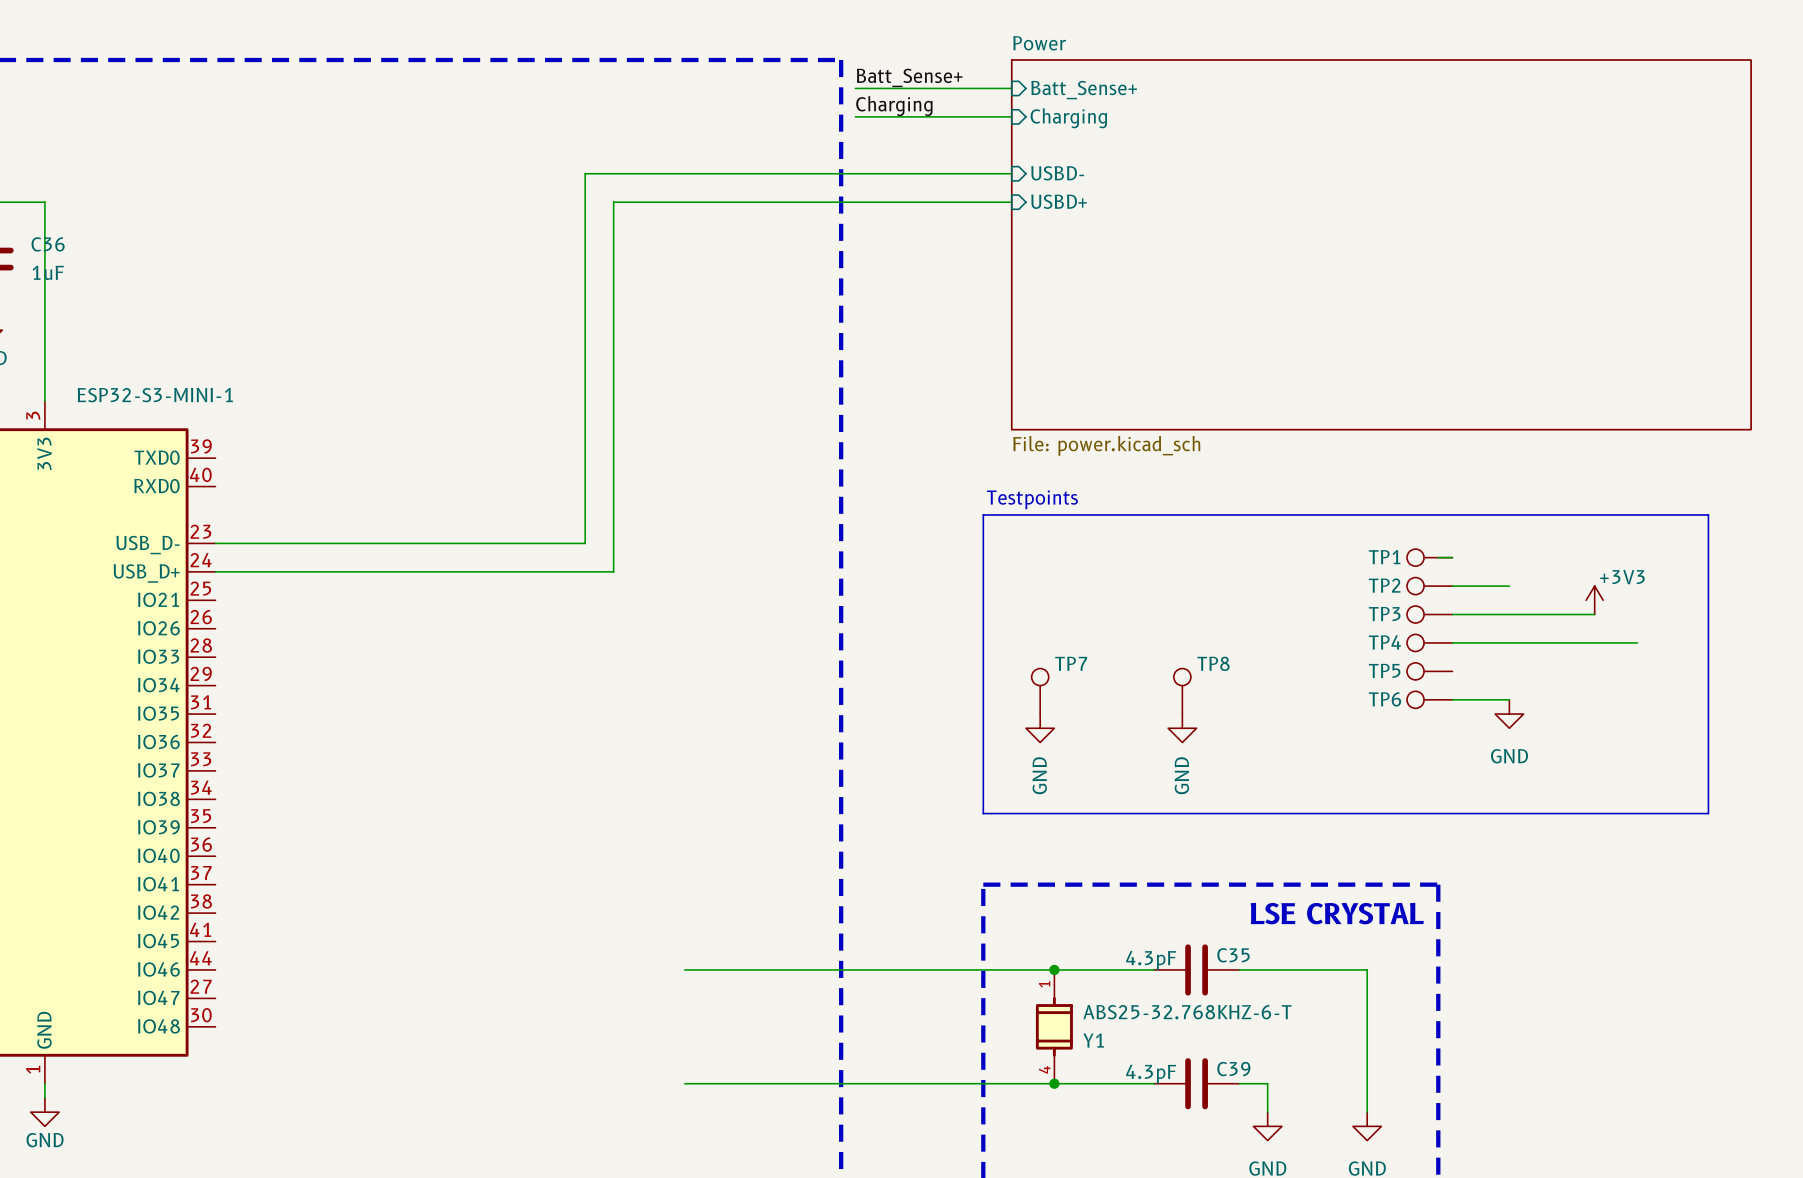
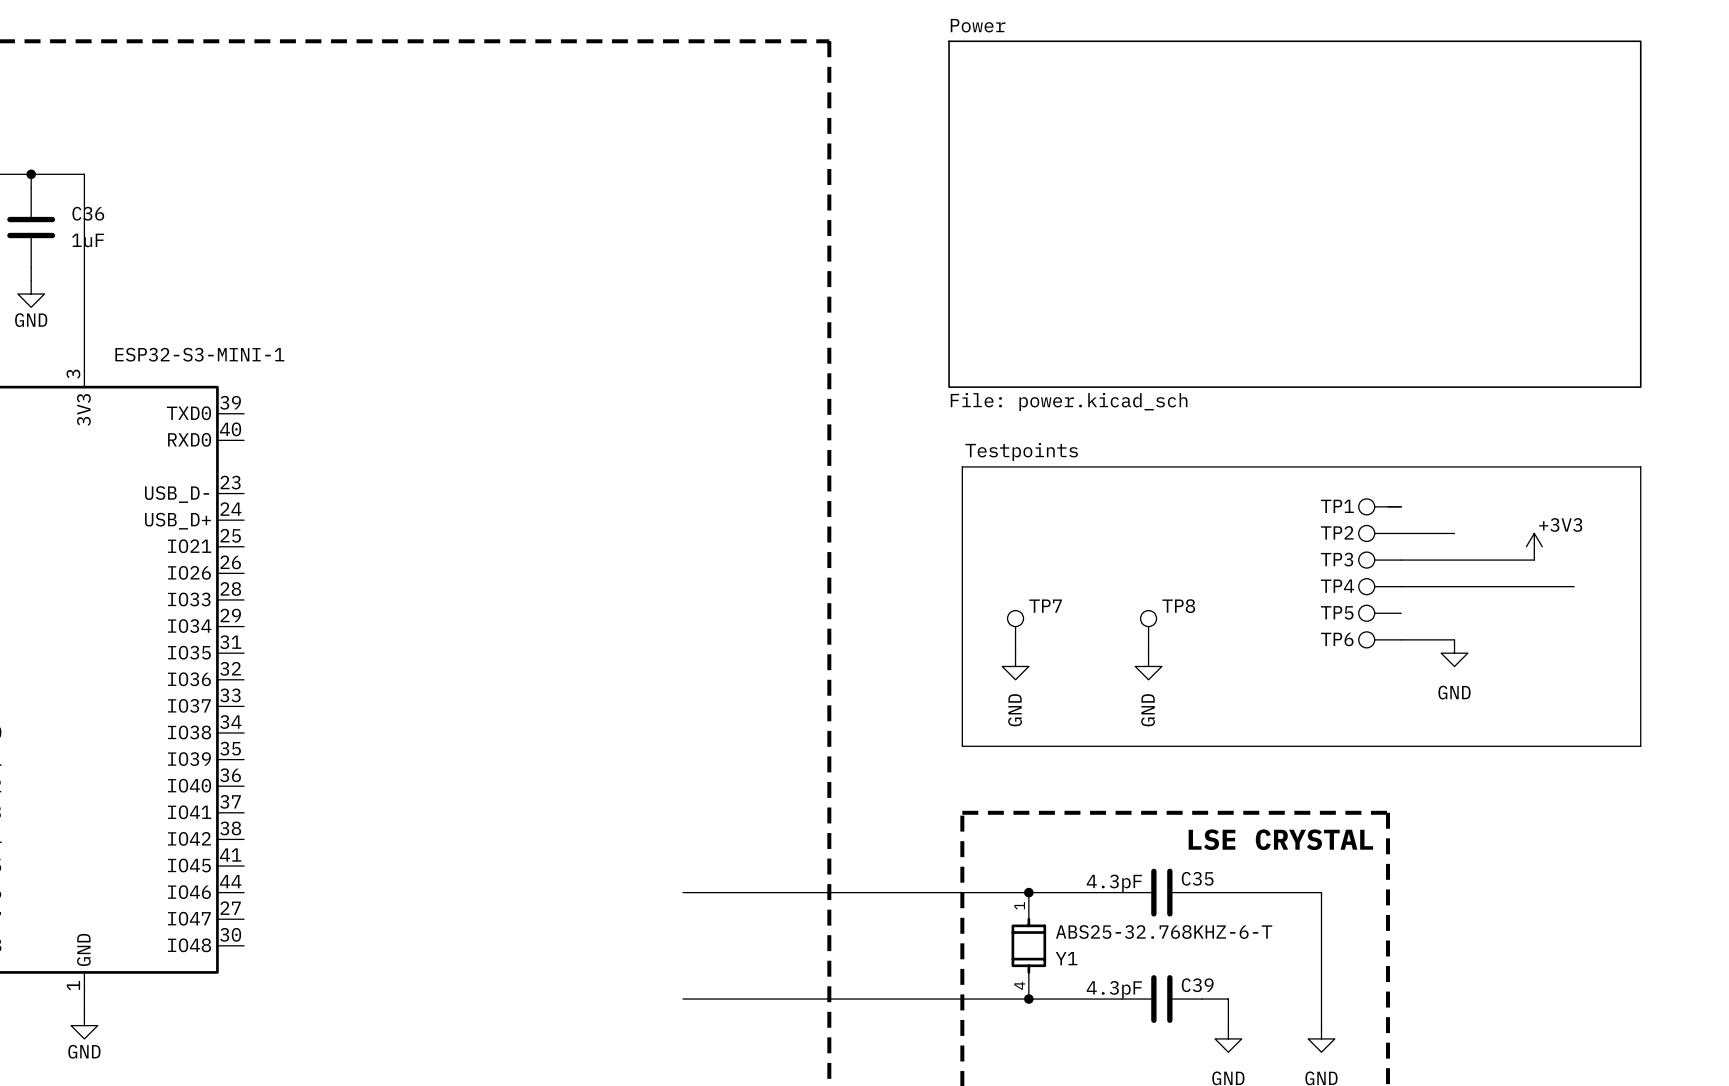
label: Batt_Sense+ (909, 77) -> none
wire: (855, 88) (1011, 88) -> none
sheet pin: Batt_Sense+ (1084, 90) -> none
label: Charging (894, 106) -> none
wire: (855, 116) (1011, 116) -> none
sheet pin: Charging (1068, 118) -> none
wire: (1011, 173) (585, 173) (585, 543) (215, 543) -> none
sheet pin: USBD- (1057, 173) -> none
sheet pin: USBD+ (1059, 201) -> none
wire: (1011, 202) (613, 202) (613, 571) (215, 571) -> none
sheet Power position: (1381, 244) -> (1294, 214)

